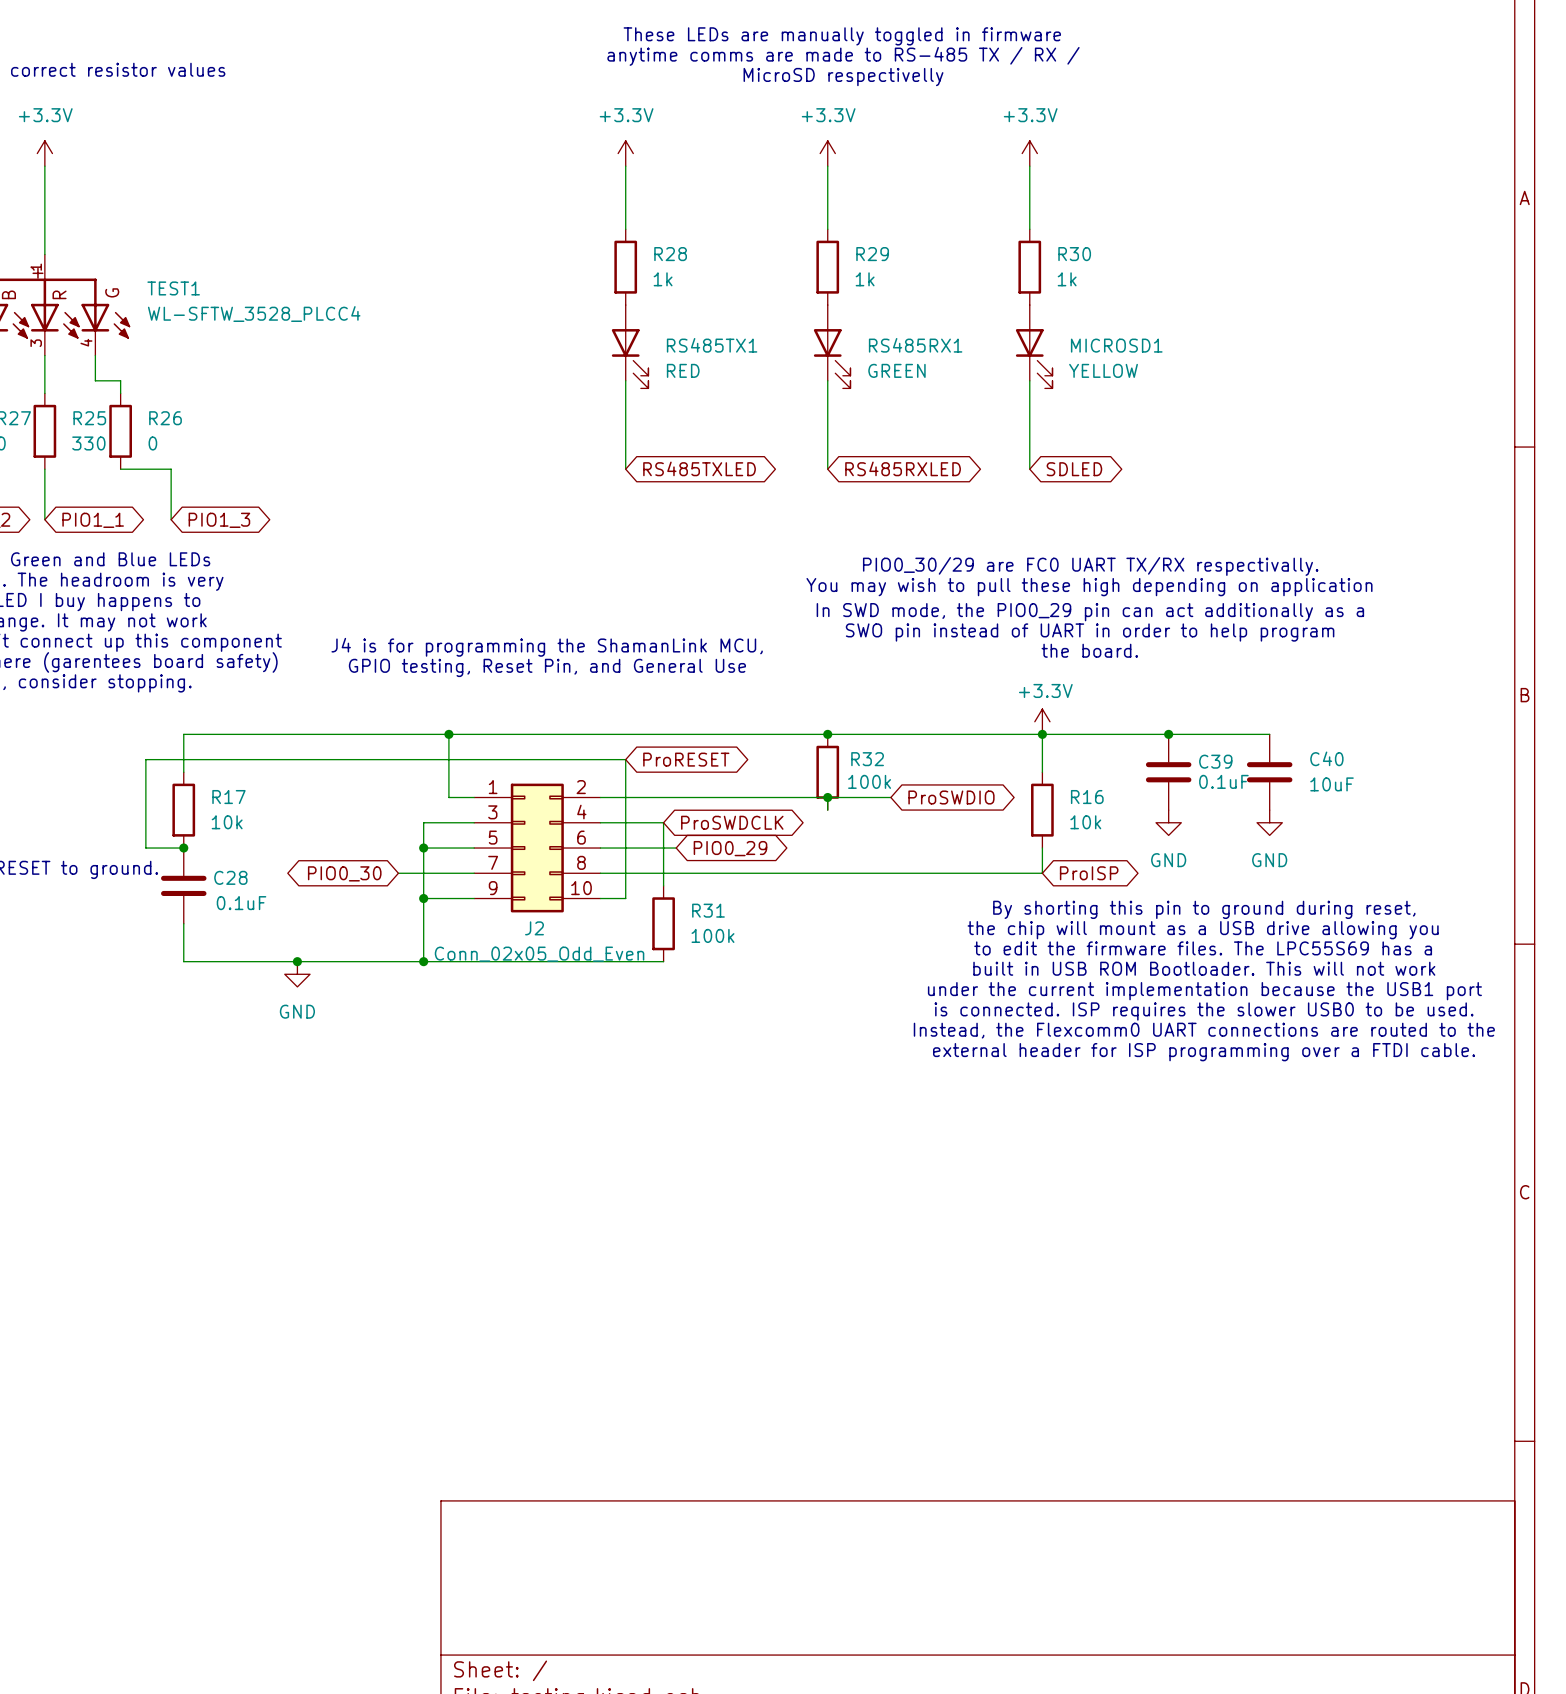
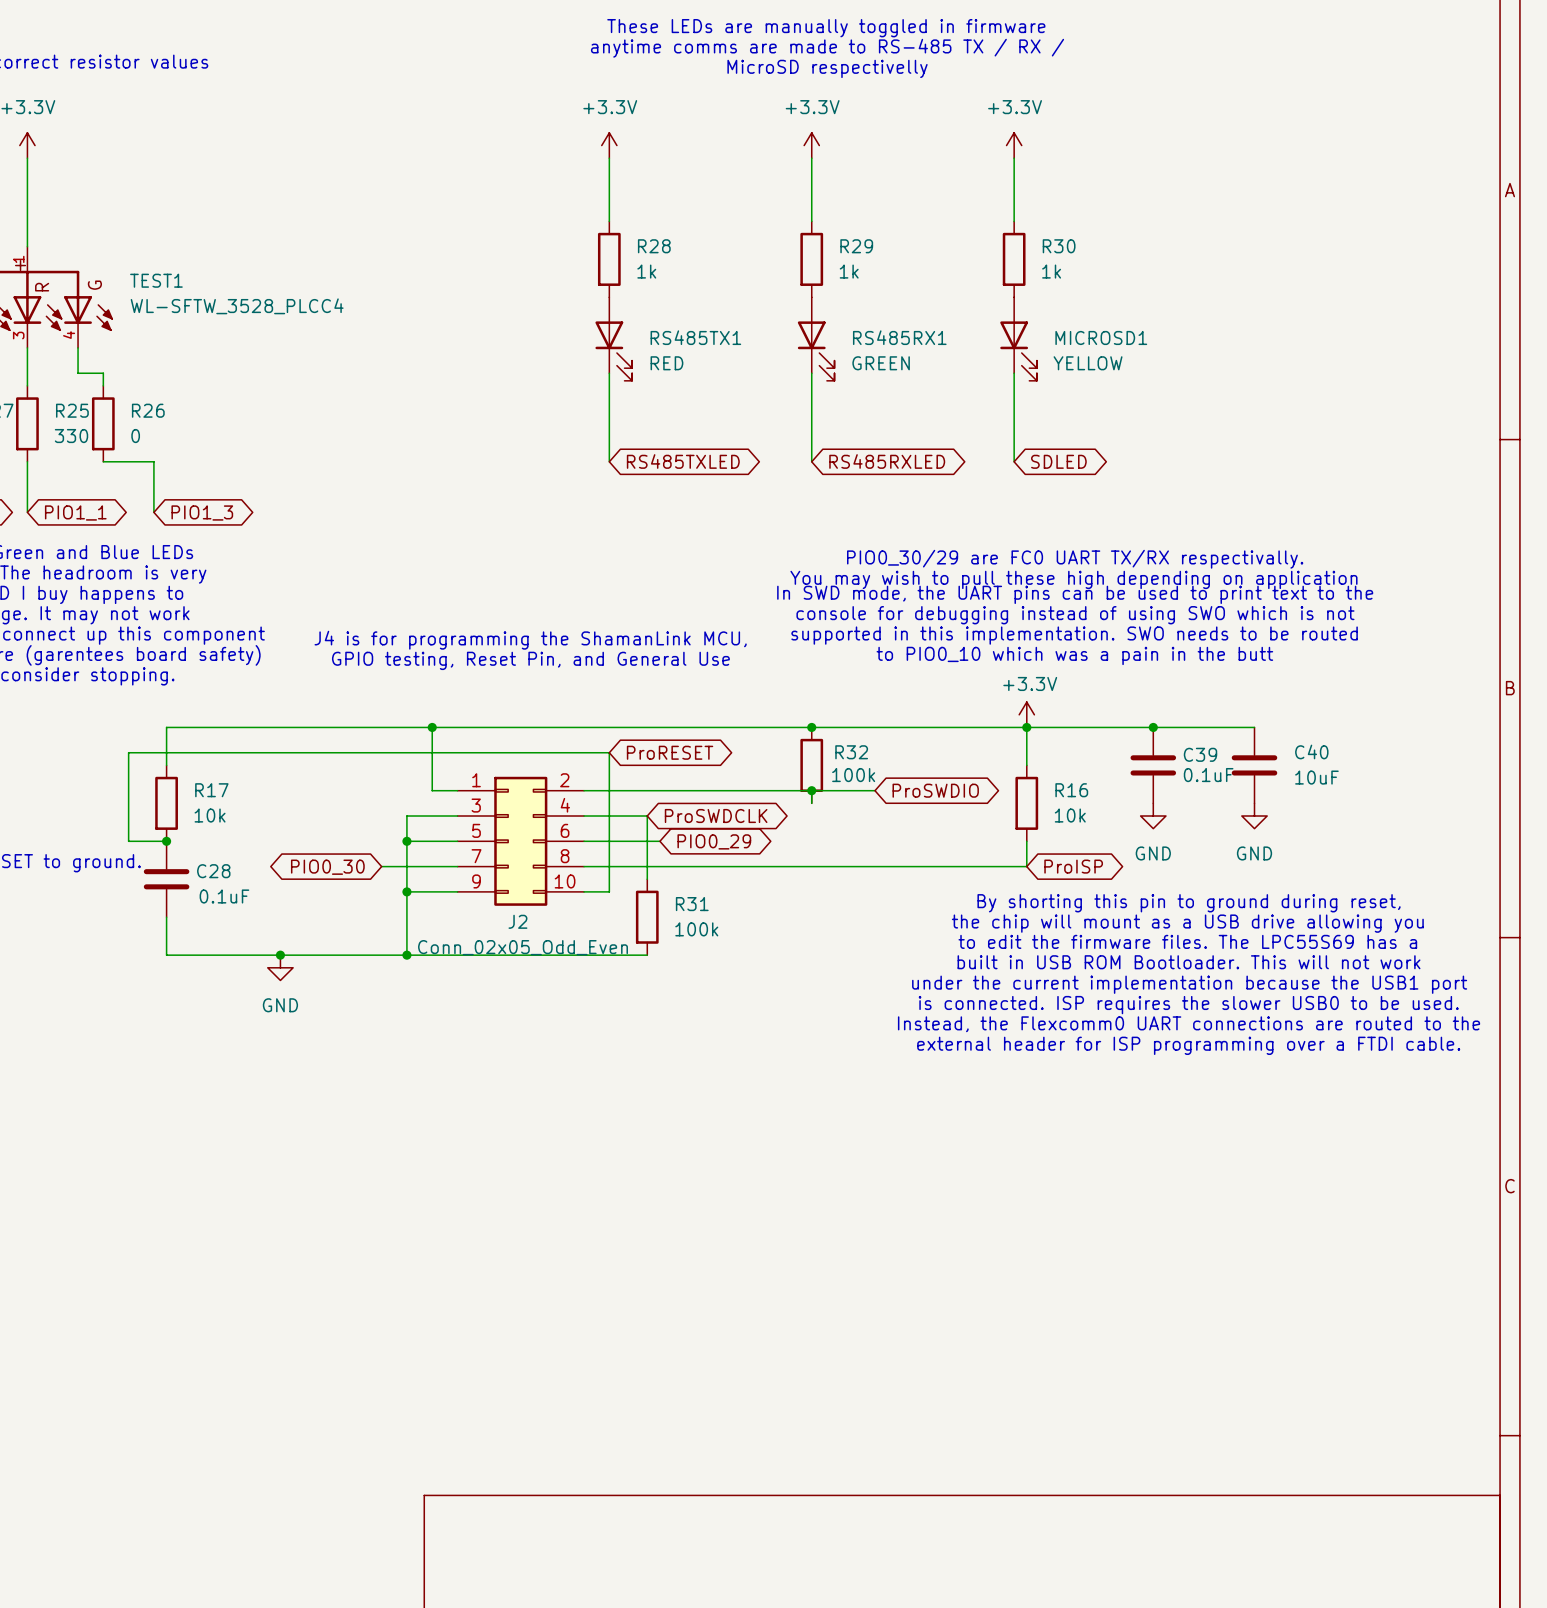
text: none -> In SWD mode, the UART pins can be used to print text to the (1075, 594)
text: In SWD mode, the PIO0_29 pin can act additionally as a (1090, 612) -> none
text: none -> console for debugging instead of using SWO which is not (1075, 615)
text: SWO pin instead of UART in order to help program (1090, 632) -> none
text: none -> supported in this implementation. SWO needs to be routed (1074, 635)
text: the board. (1089, 650) -> none
text: none -> to PIO0_10 which was a pain in the butt (1074, 655)

